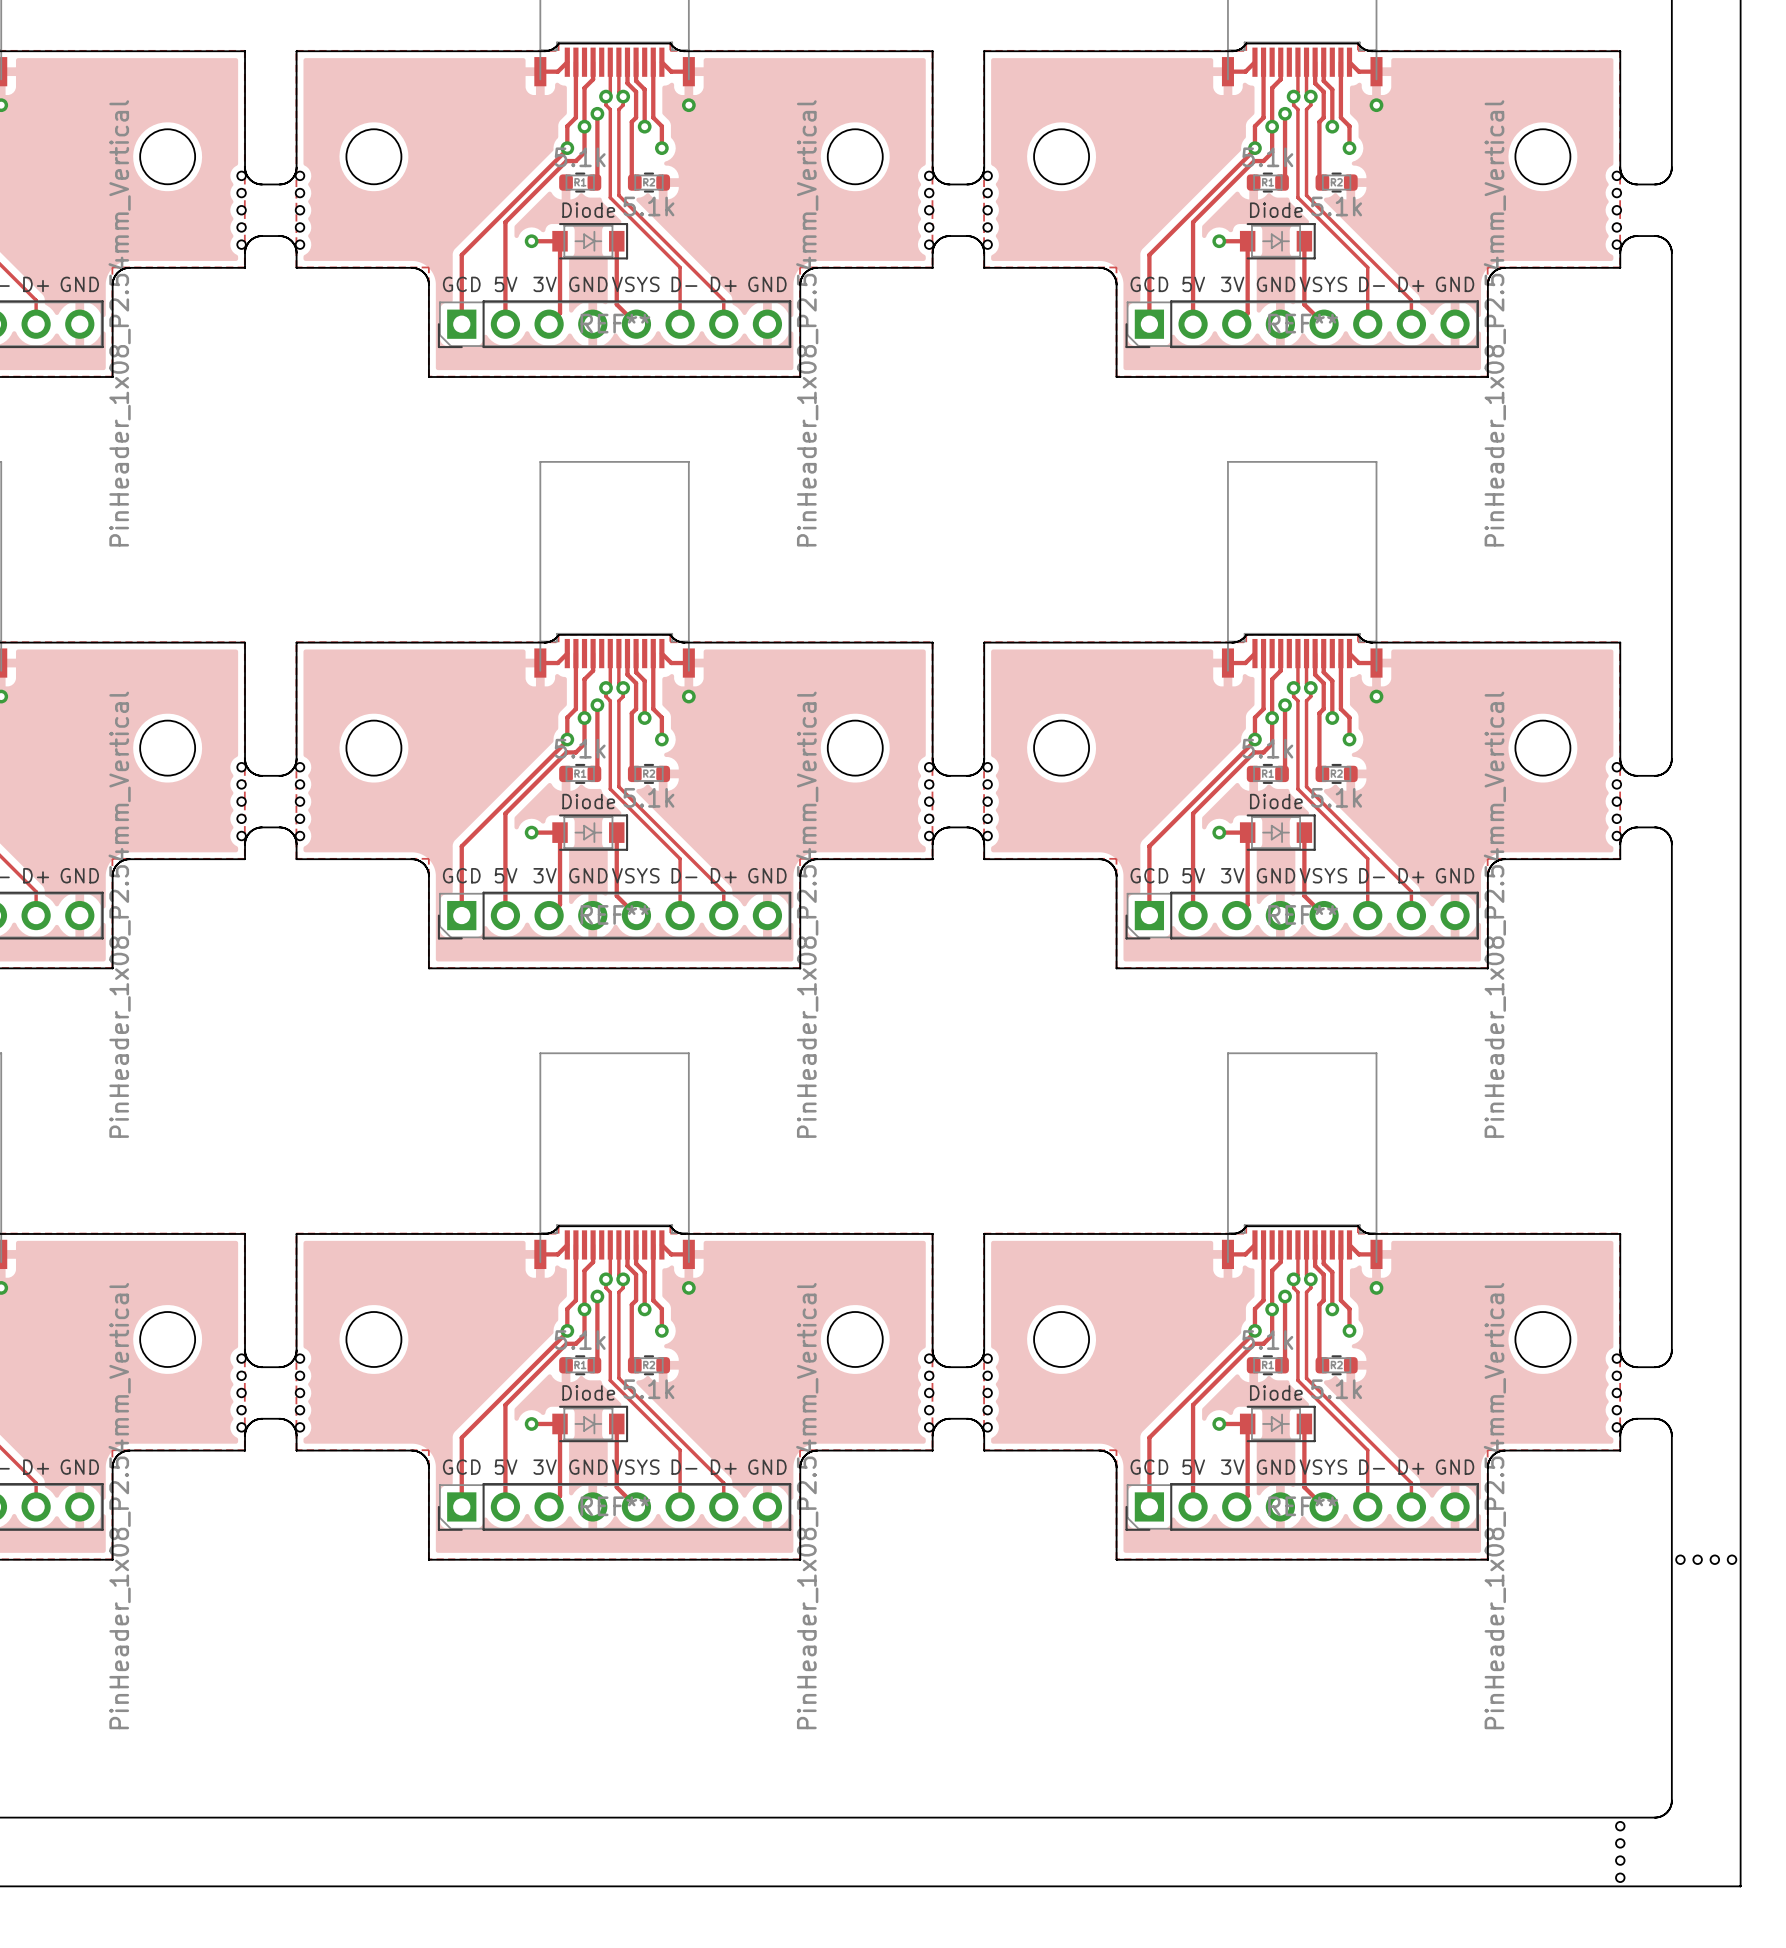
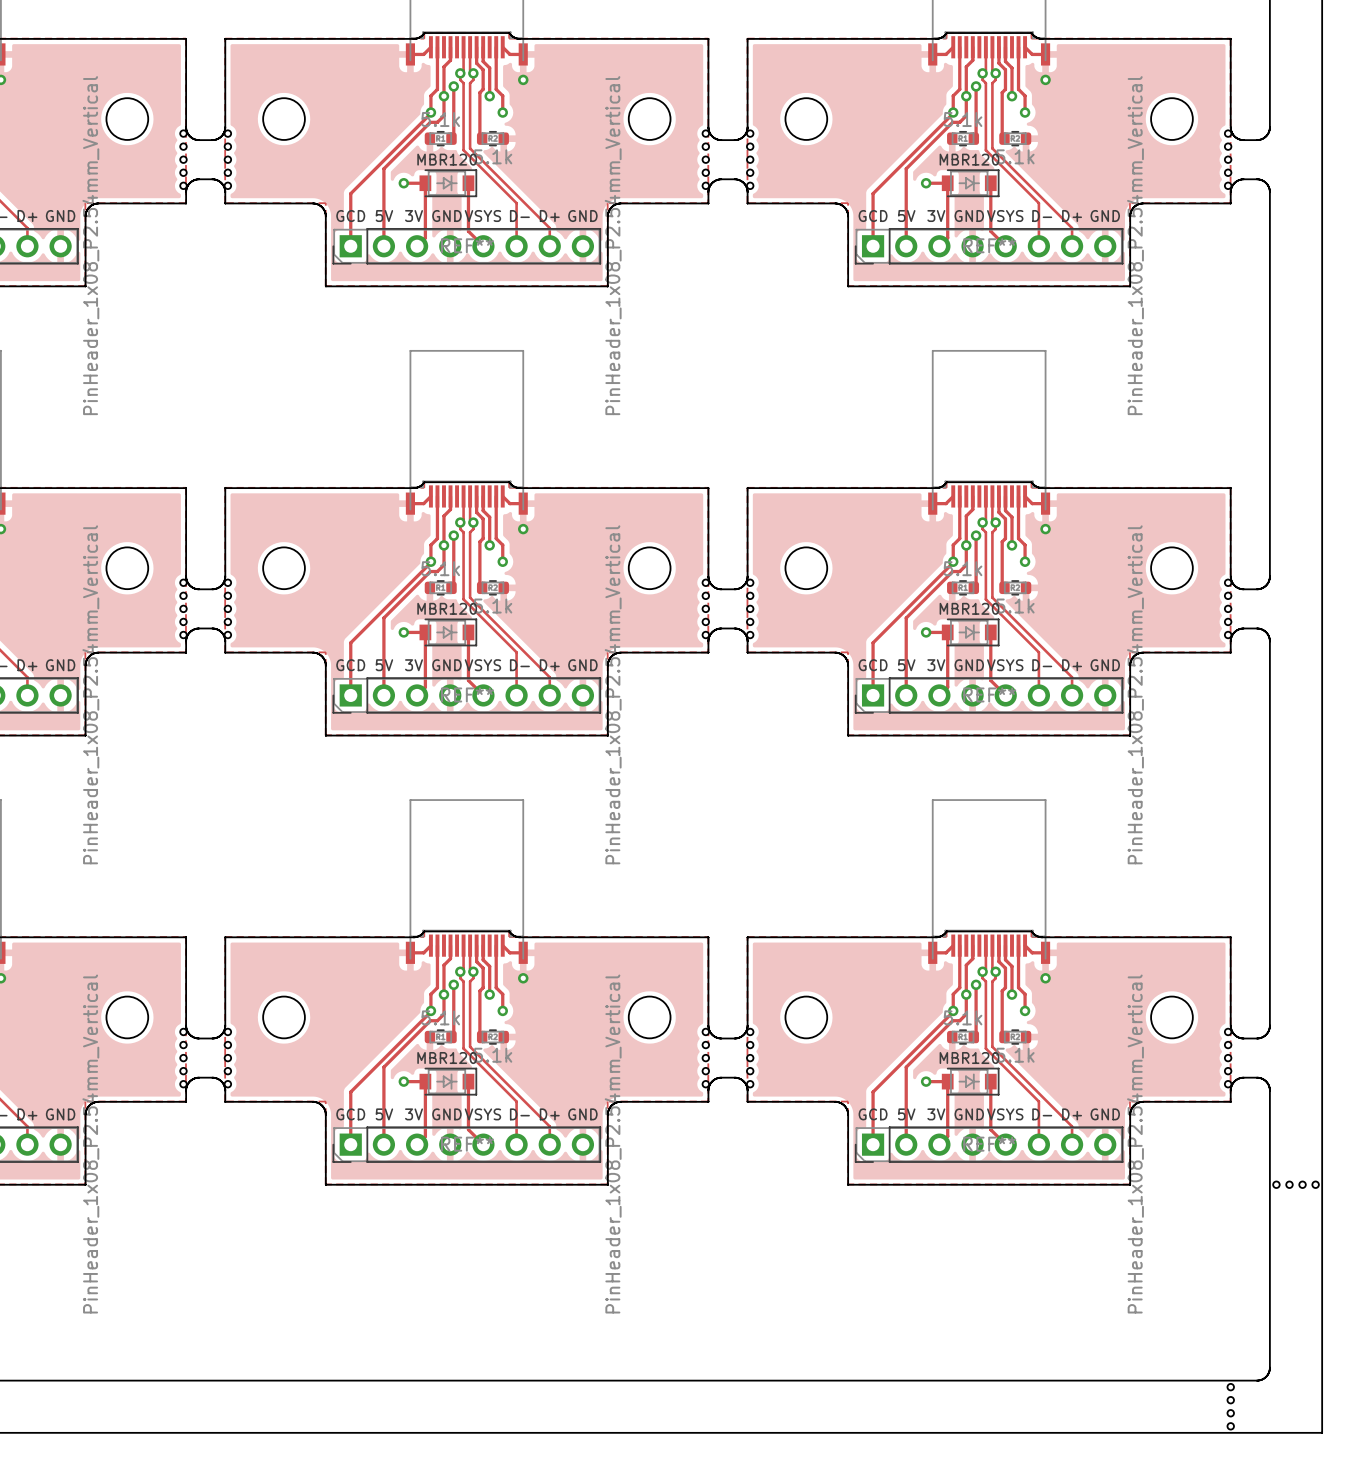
part text: Diode (588, 210) -> MBR120 (447, 159)
part text: Diode (1276, 210) -> MBR120 (969, 159)
part text: Diode (588, 801) -> MBR120 (447, 608)
part text: Diode (1276, 801) -> MBR120 (969, 608)
part text: Diode (588, 1392) -> MBR120 (447, 1058)
part text: Diode (1276, 1392) -> MBR120 (969, 1058)

